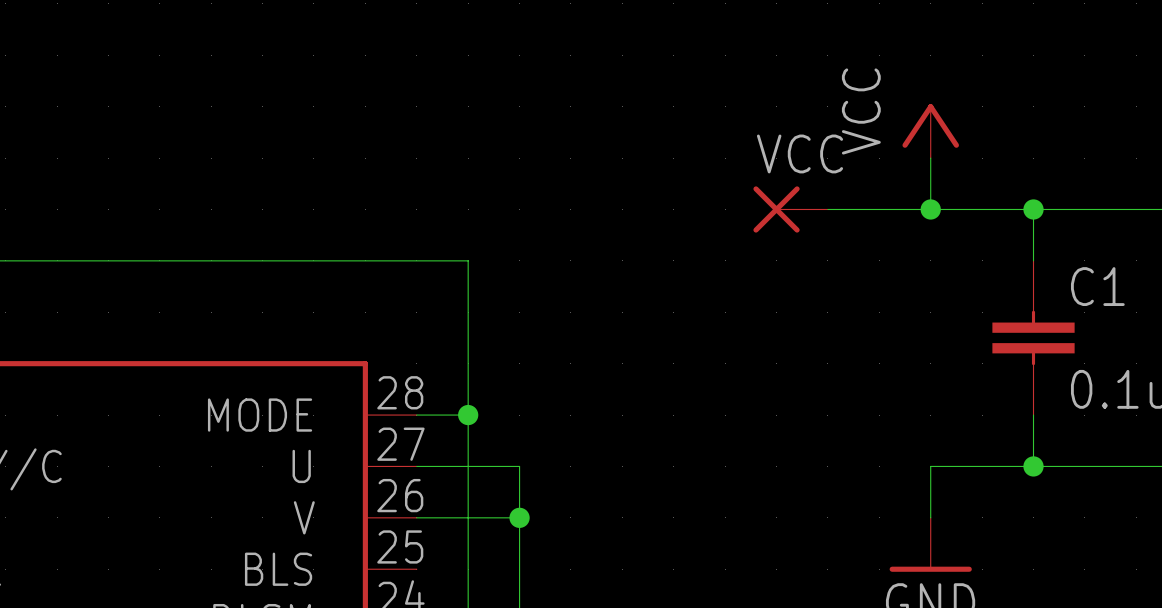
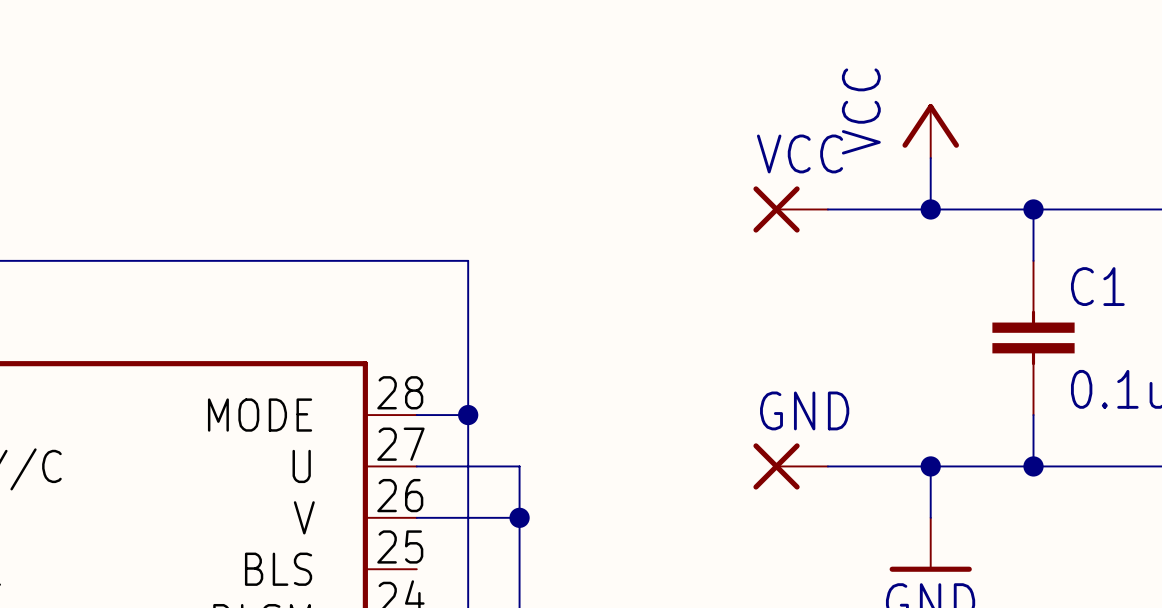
GND: none -> (790, 466)
wire: none -> (827, 466) (930, 466)
junction: none -> (930, 466)

